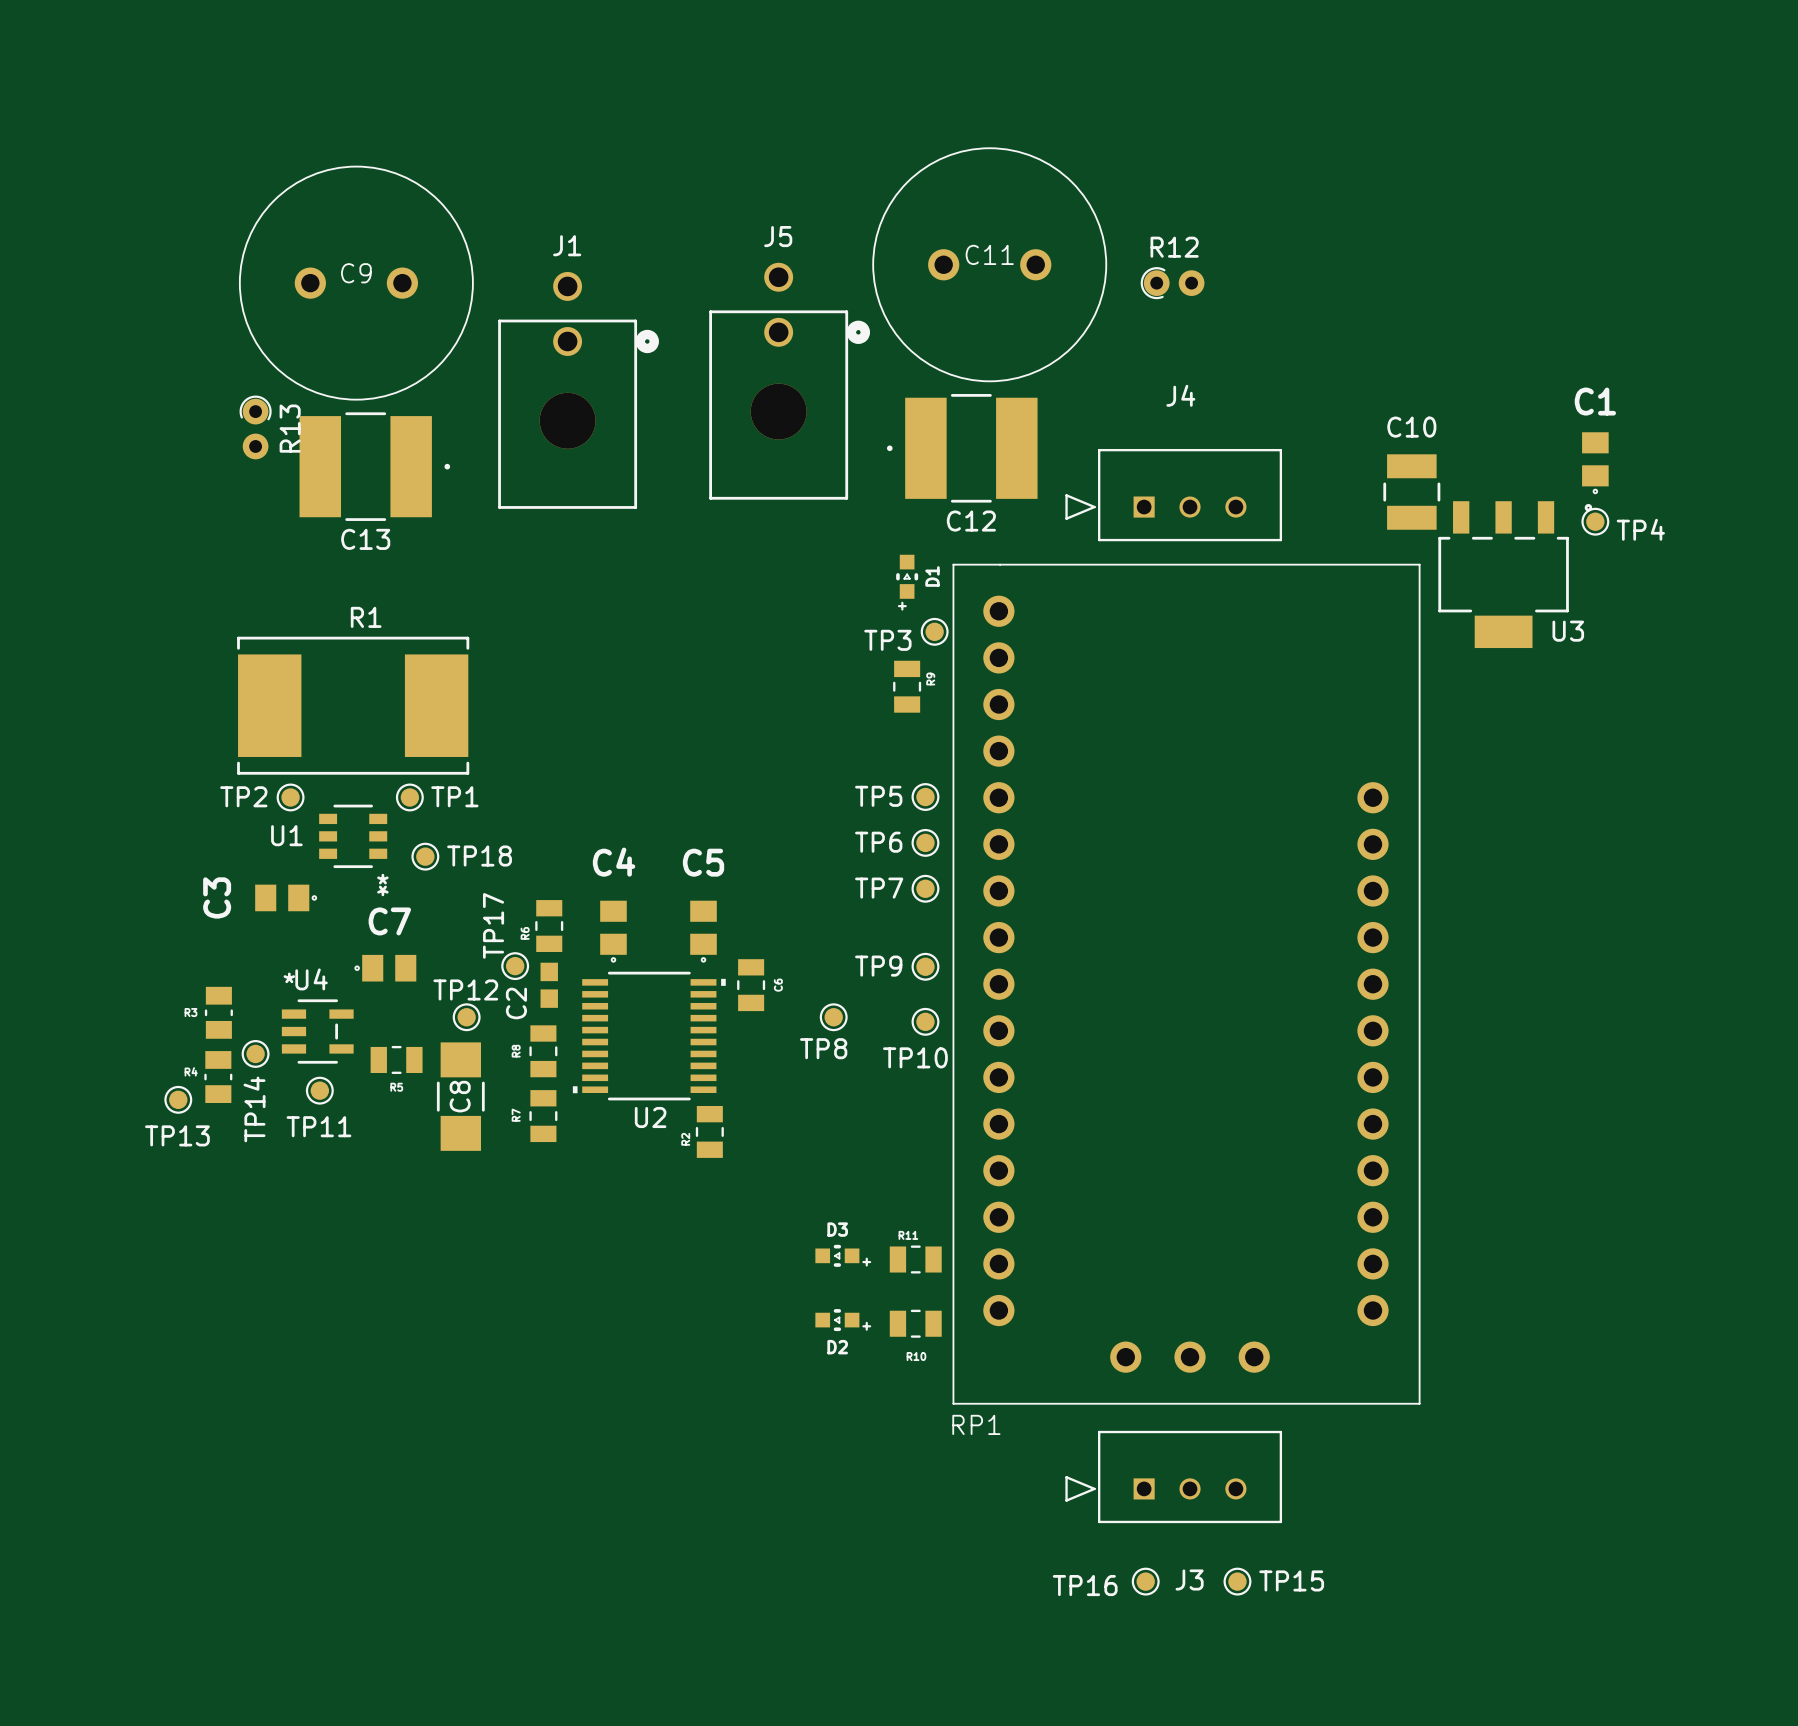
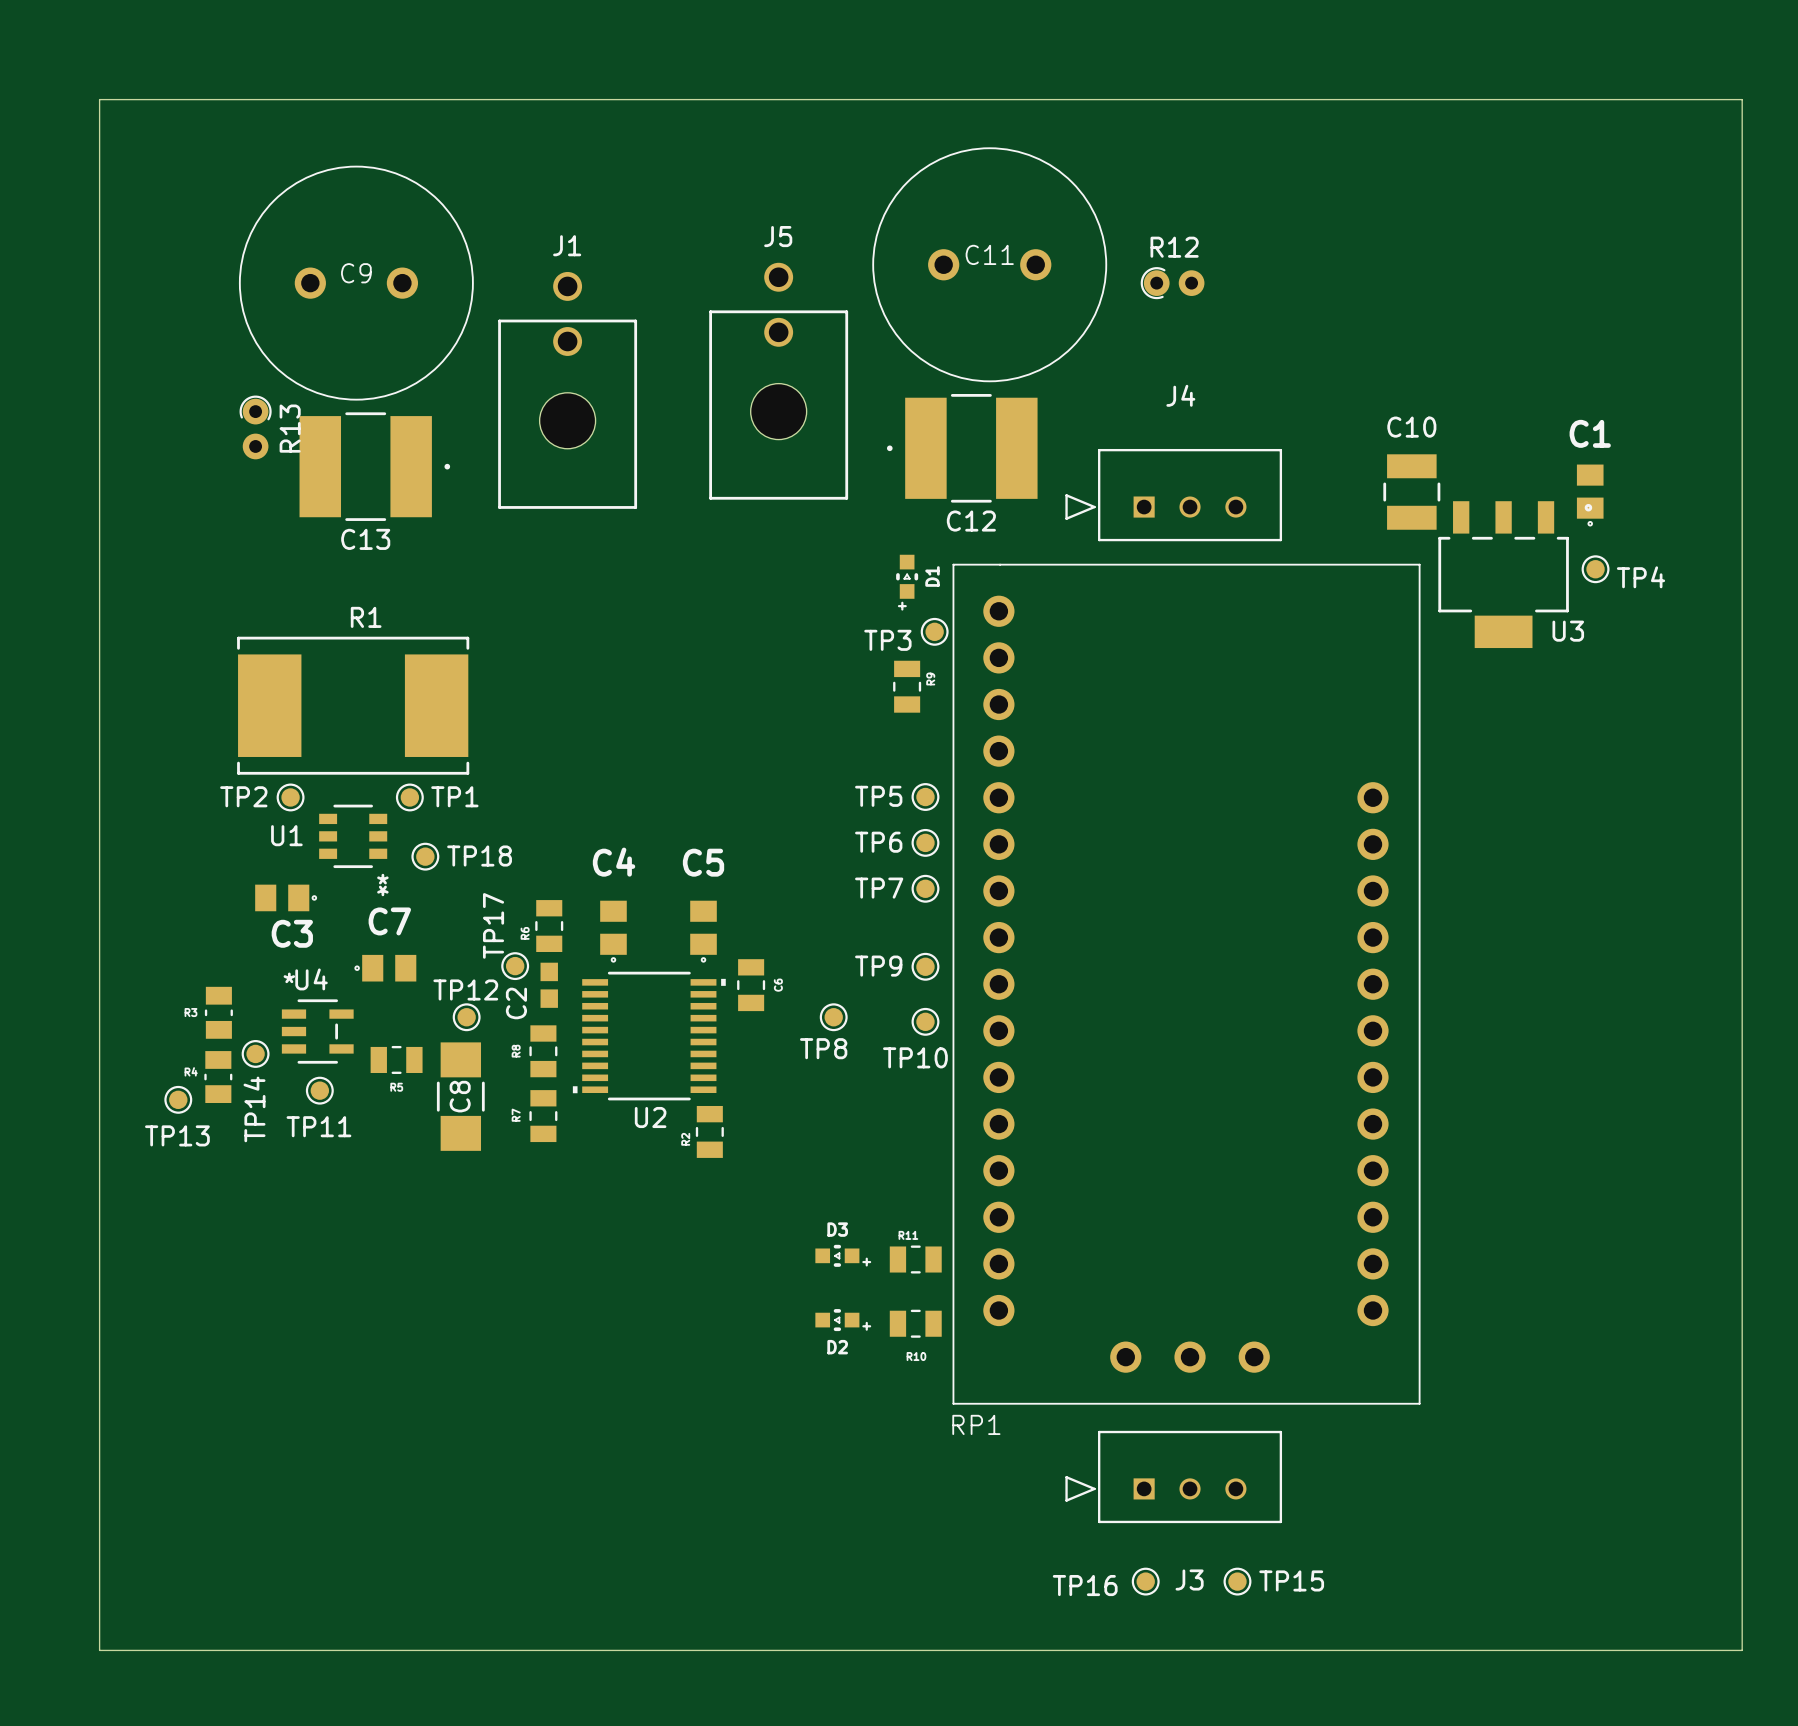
board edge: none -> (99, 99) (1742, 99) (1742, 1650) (99, 1650) (99, 99)
J5 footprint: [709, 262, 871, 500] -> [709, 262, 849, 500]
J1 footprint: [498, 271, 659, 509] -> [498, 271, 638, 509]
C1 position: (1595, 463) -> (1590, 495)
TP4 position: (1595, 521) -> (1595, 569)
C3 name rotation: 0° (217, 897) -> 90° clockwise (292, 933)
C3 name position: C3 (217, 897) -> C3 (292, 933)

